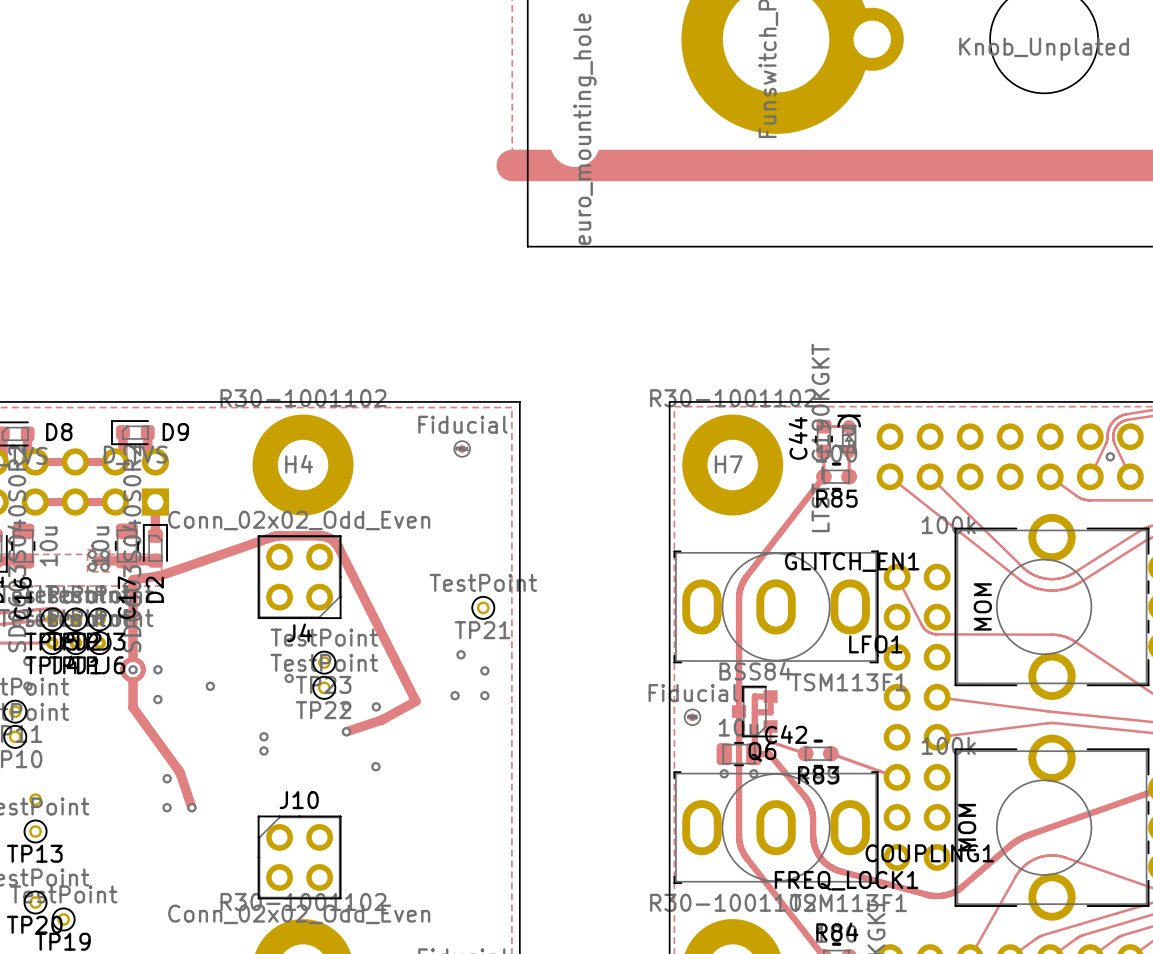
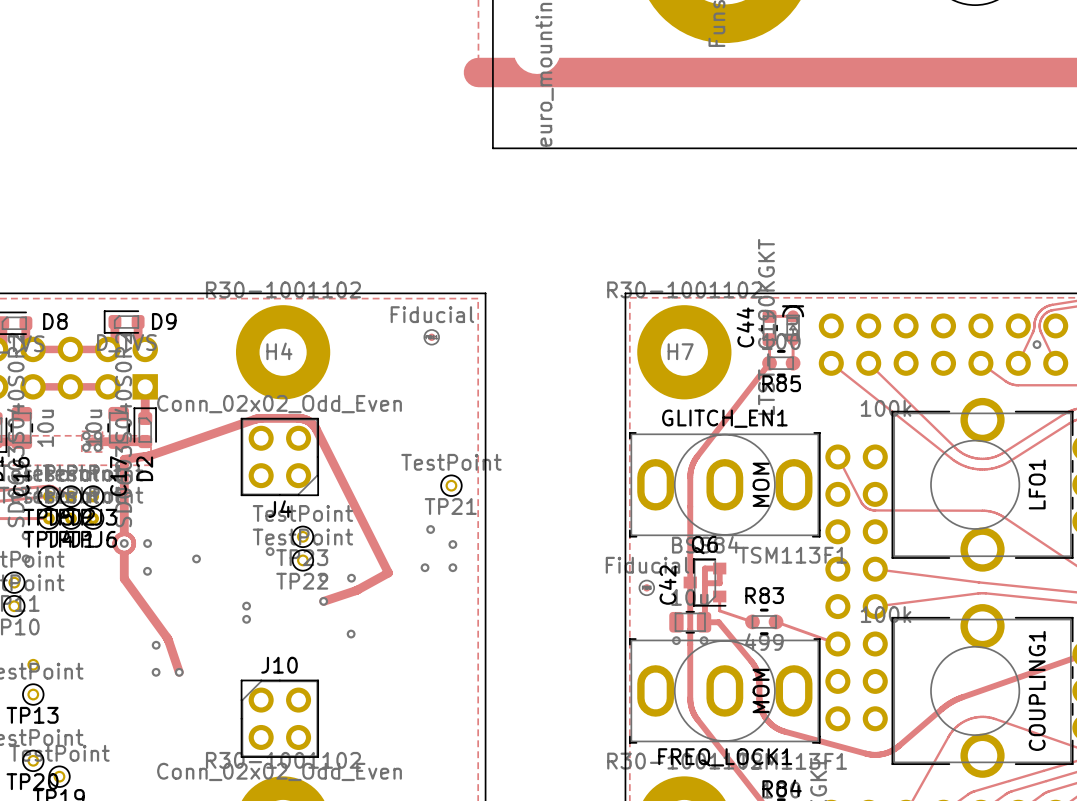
GLITCH_EN1 name position: GLITCH_EN1 (852, 562) -> GLITCH_EN1 (724, 418)
GLITCH_EN1 text position: MOM (982, 606) -> MOM (761, 484)
LFO1 name rotation: 0° (875, 644) -> 90° counterclockwise (1037, 484)
LFO1 name position: LFO1 (875, 644) -> LFO1 (1037, 484)
C42 name rotation: 0° (786, 734) -> 90° counterclockwise (667, 585)
C42 name position: C42 (786, 734) -> C42 (667, 585)
Q6 name position: Q6 (762, 751) -> Q6 (704, 545)
R83 name position: R83 (818, 775) -> R83 (764, 595)
FREQ_LOCK1 text position: MOM (967, 827) -> MOM (761, 690)
COUPLING1 name rotation: 0° (929, 853) -> 90° counterclockwise (1037, 690)
COUPLING1 name position: COUPLING1 (929, 853) -> COUPLING1 (1037, 690)
FREQ_LOCK1 name position: FREQ_LOCK1 (846, 880) -> FREQ_LOCK1 (725, 757)

